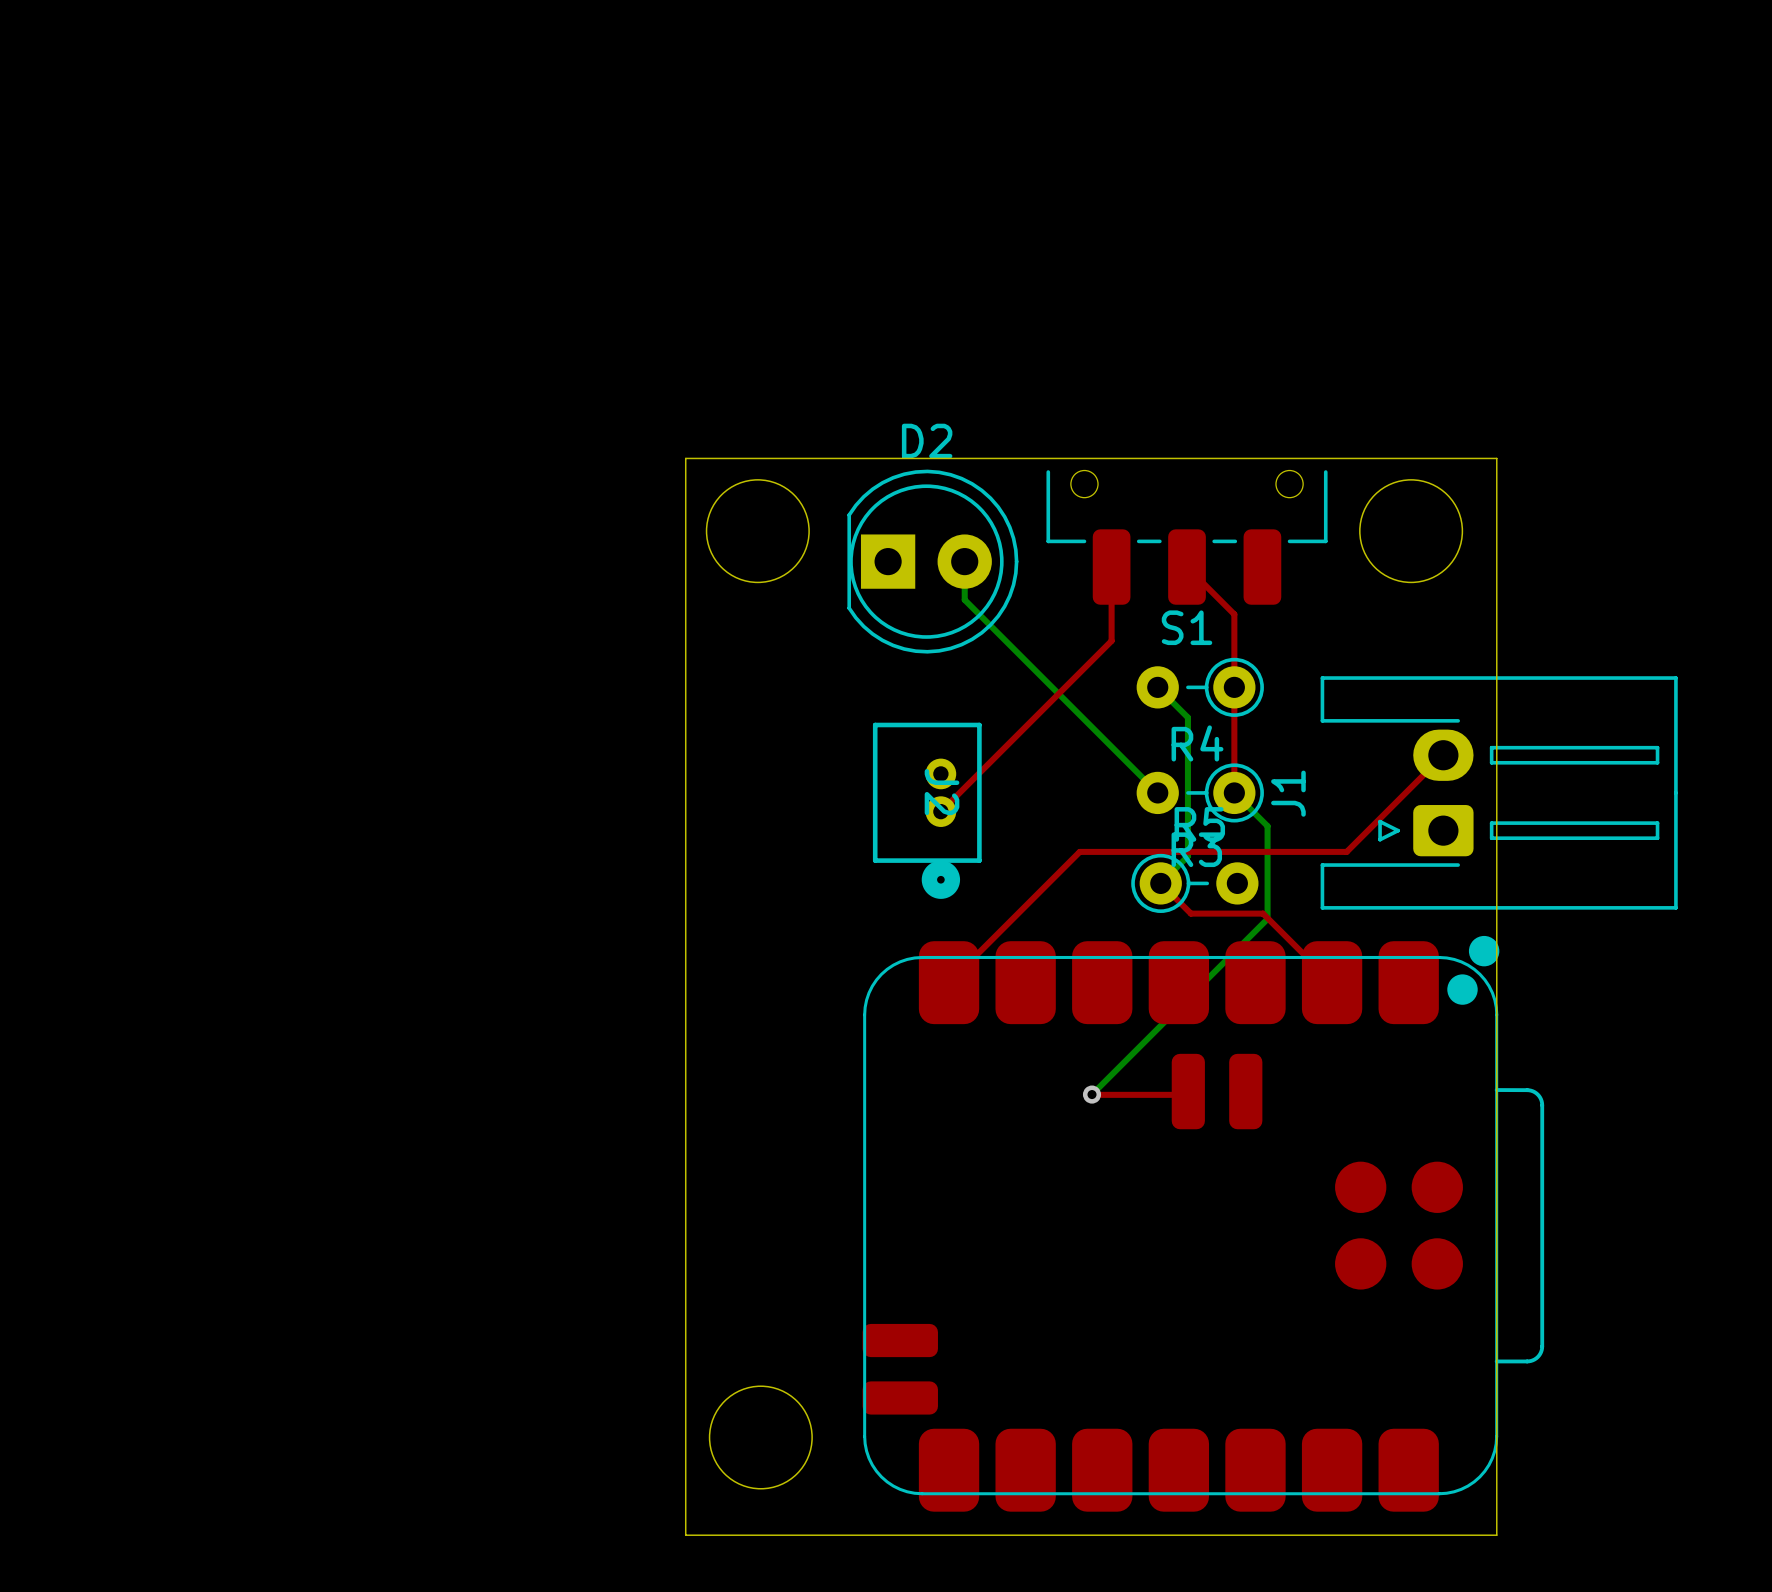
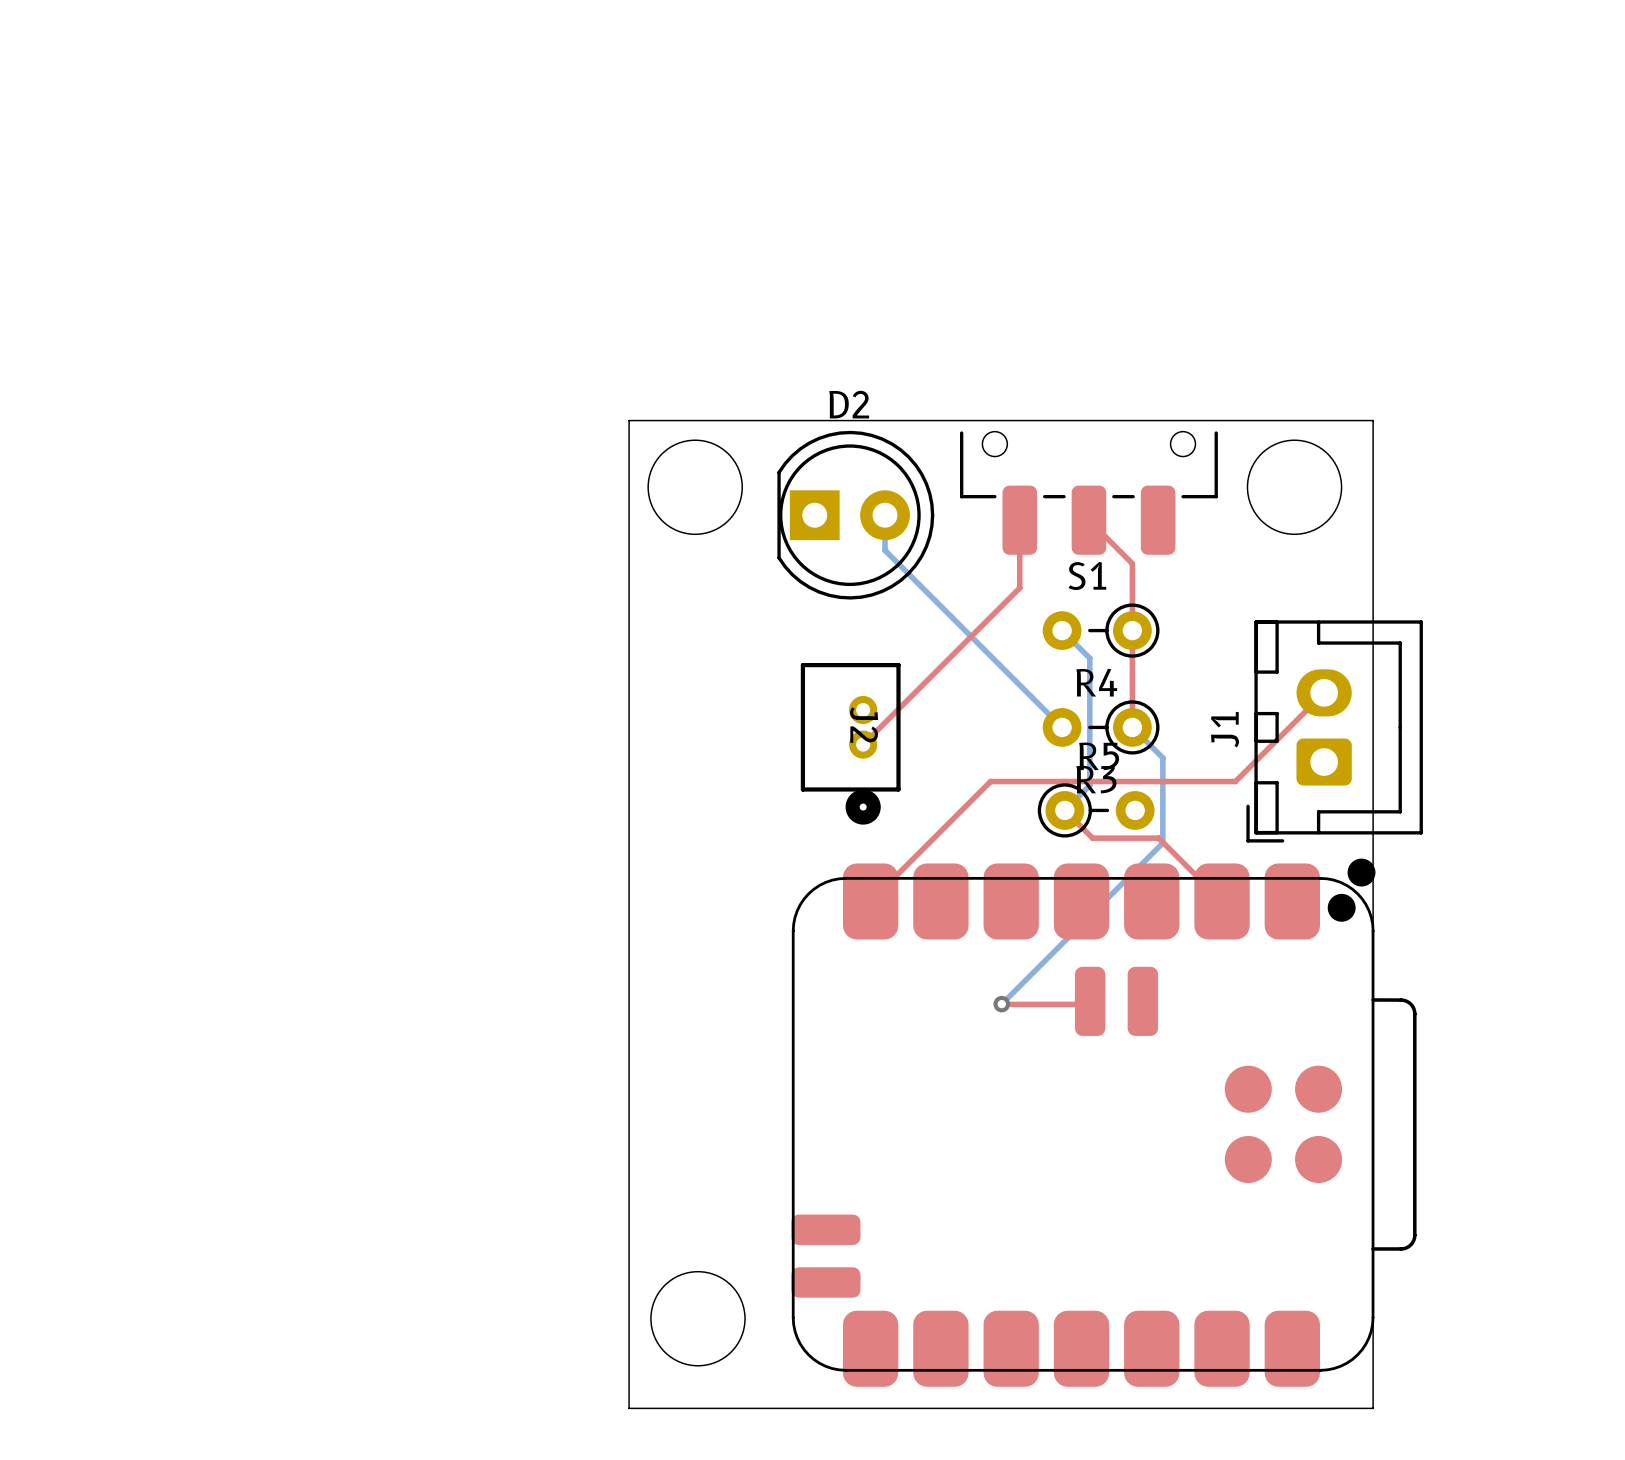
J1 footprint: [1320, 676, 1678, 910] -> [1246, 620, 1423, 843]
J1 name position: J1 (1288, 793) -> J1 (1225, 729)

